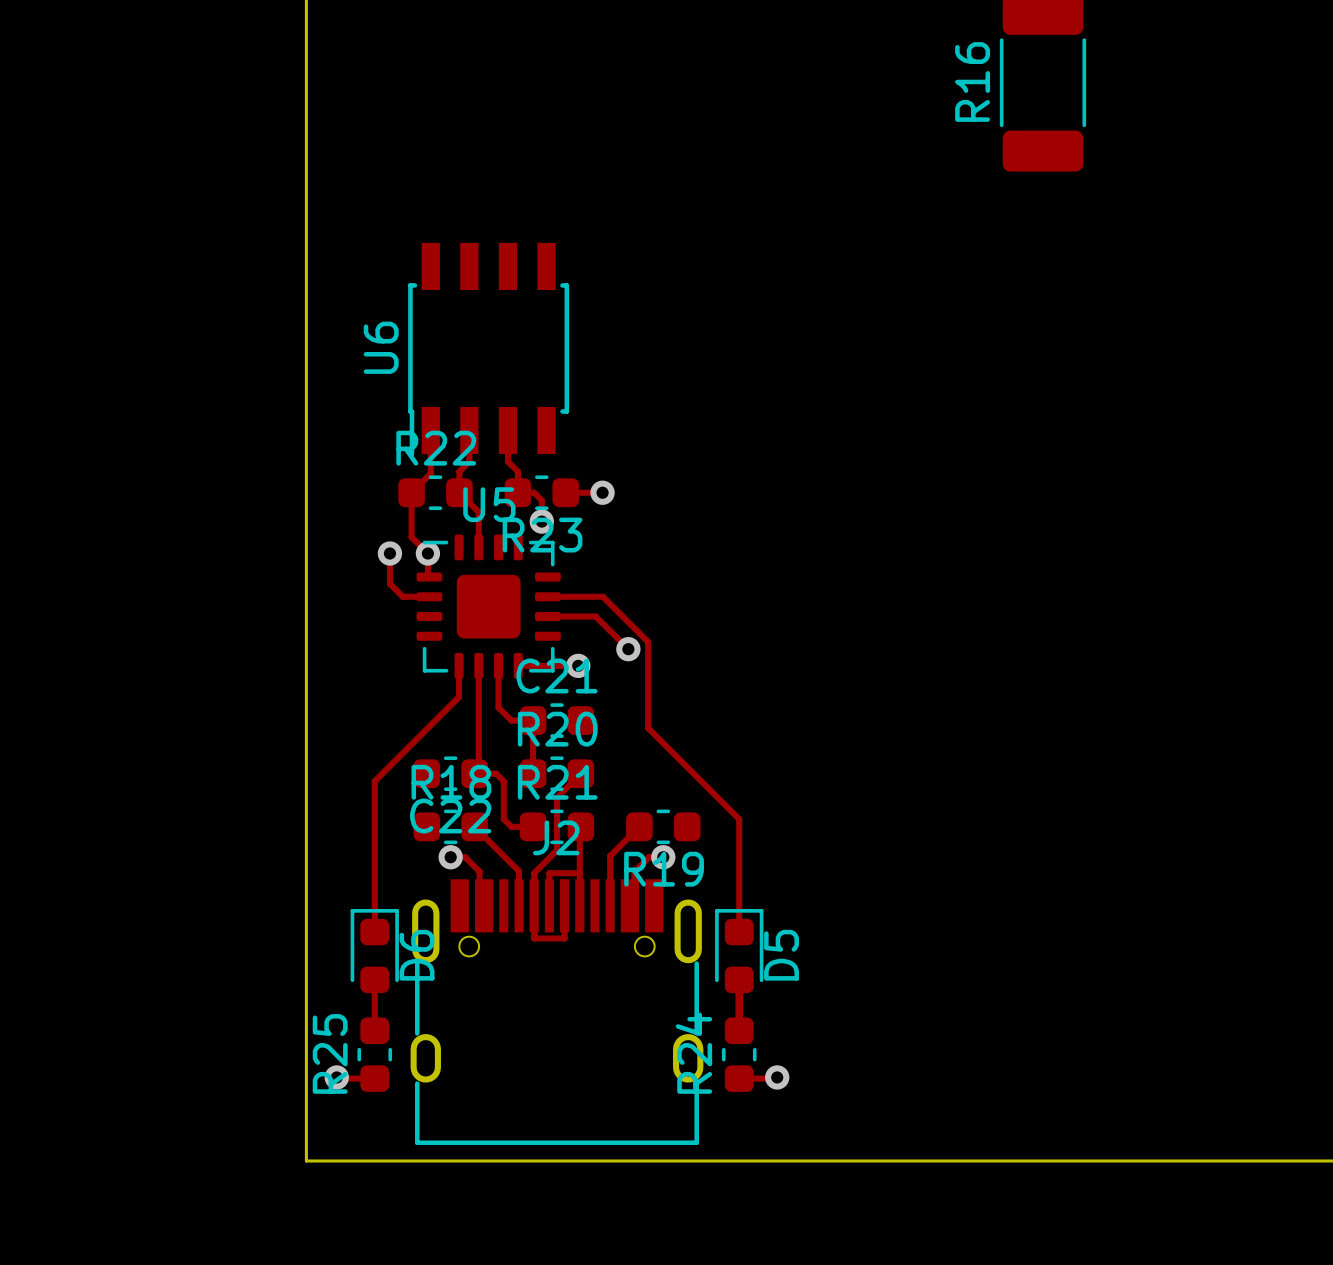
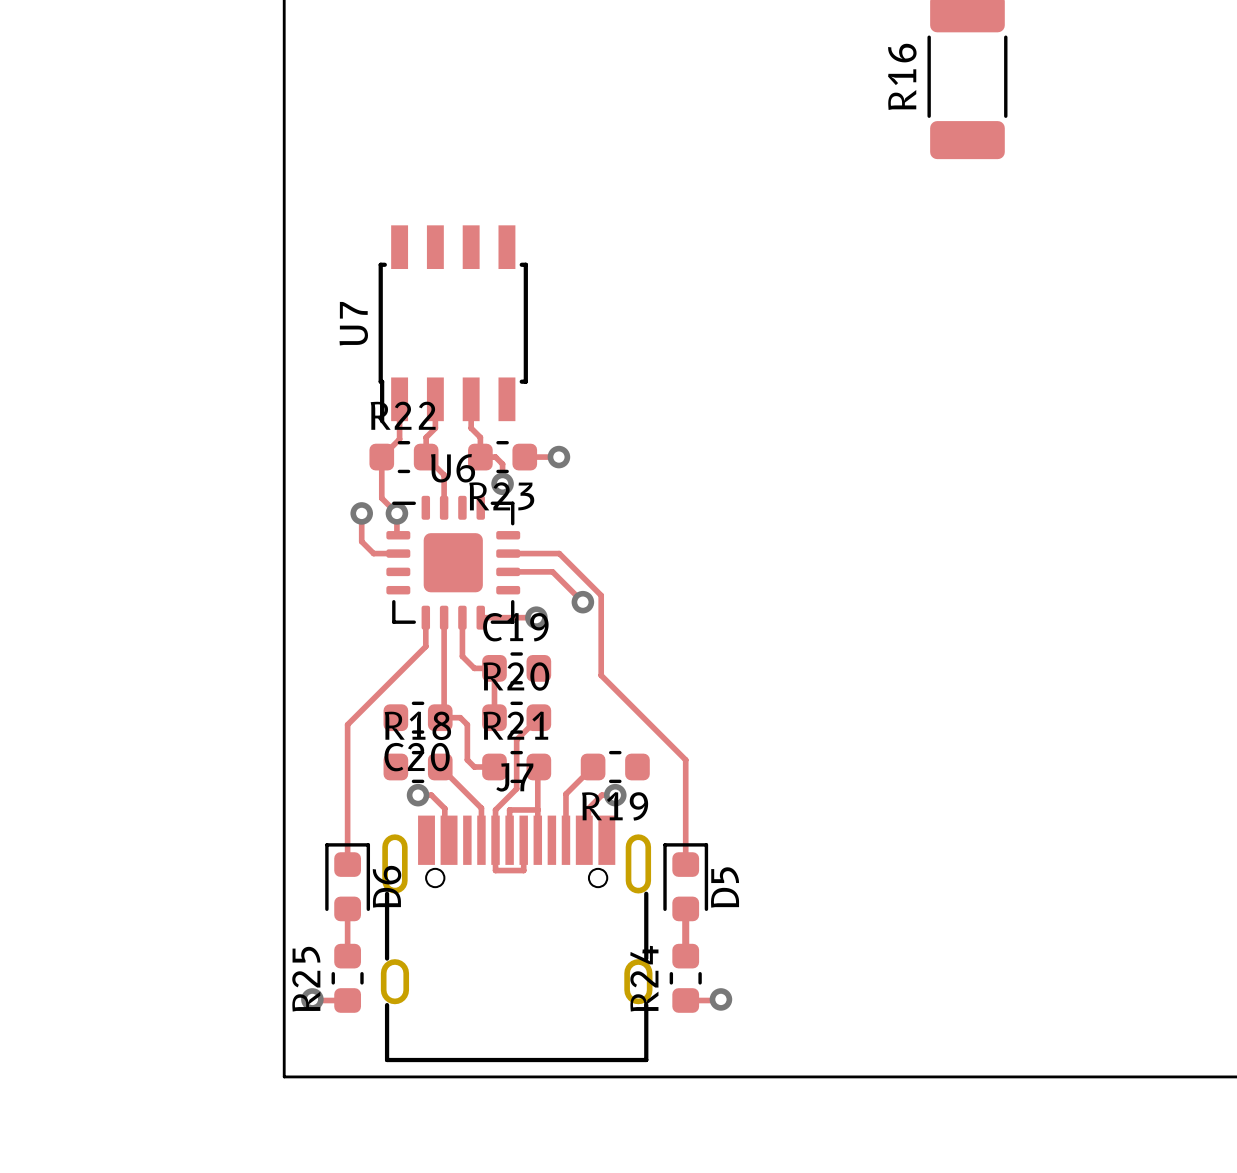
U6 name: U6 (381, 347) -> U7 (353, 323)
U5 name: U5 (489, 504) -> U6 (453, 468)
C21 name: C21 (556, 675) -> C19 (515, 627)
C22 name: C22 (450, 816) -> C20 (417, 757)
J2 name: J2 (556, 837) -> J7 (514, 777)

